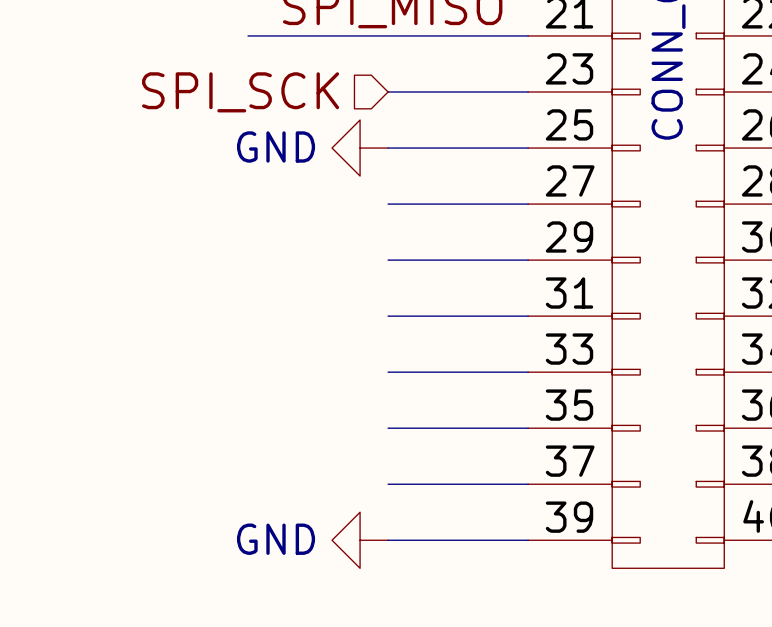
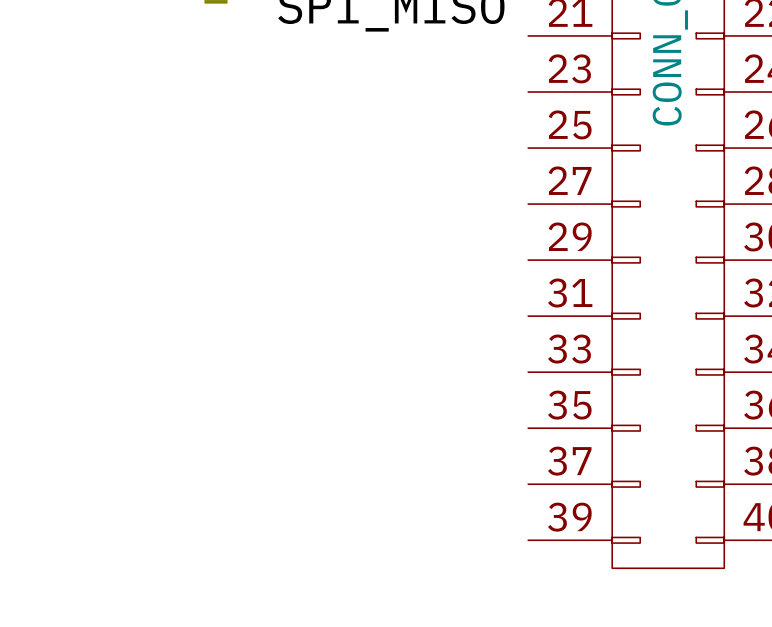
wire: (247, 35) (528, 35) -> none
hierarchical label: SPI_SCK (240, 92) -> none
wire: (388, 92) (528, 92) -> none
power symbol: GND (360, 148) -> none
wire: (388, 148) (528, 148) -> none
wire: (388, 204) (528, 204) -> none
wire: (388, 260) (528, 260) -> none
wire: (388, 316) (528, 316) -> none
wire: (388, 372) (528, 372) -> none
wire: (388, 428) (528, 428) -> none
wire: (388, 484) (528, 484) -> none
power symbol: GND (360, 540) -> none
wire: (388, 540) (528, 540) -> none

